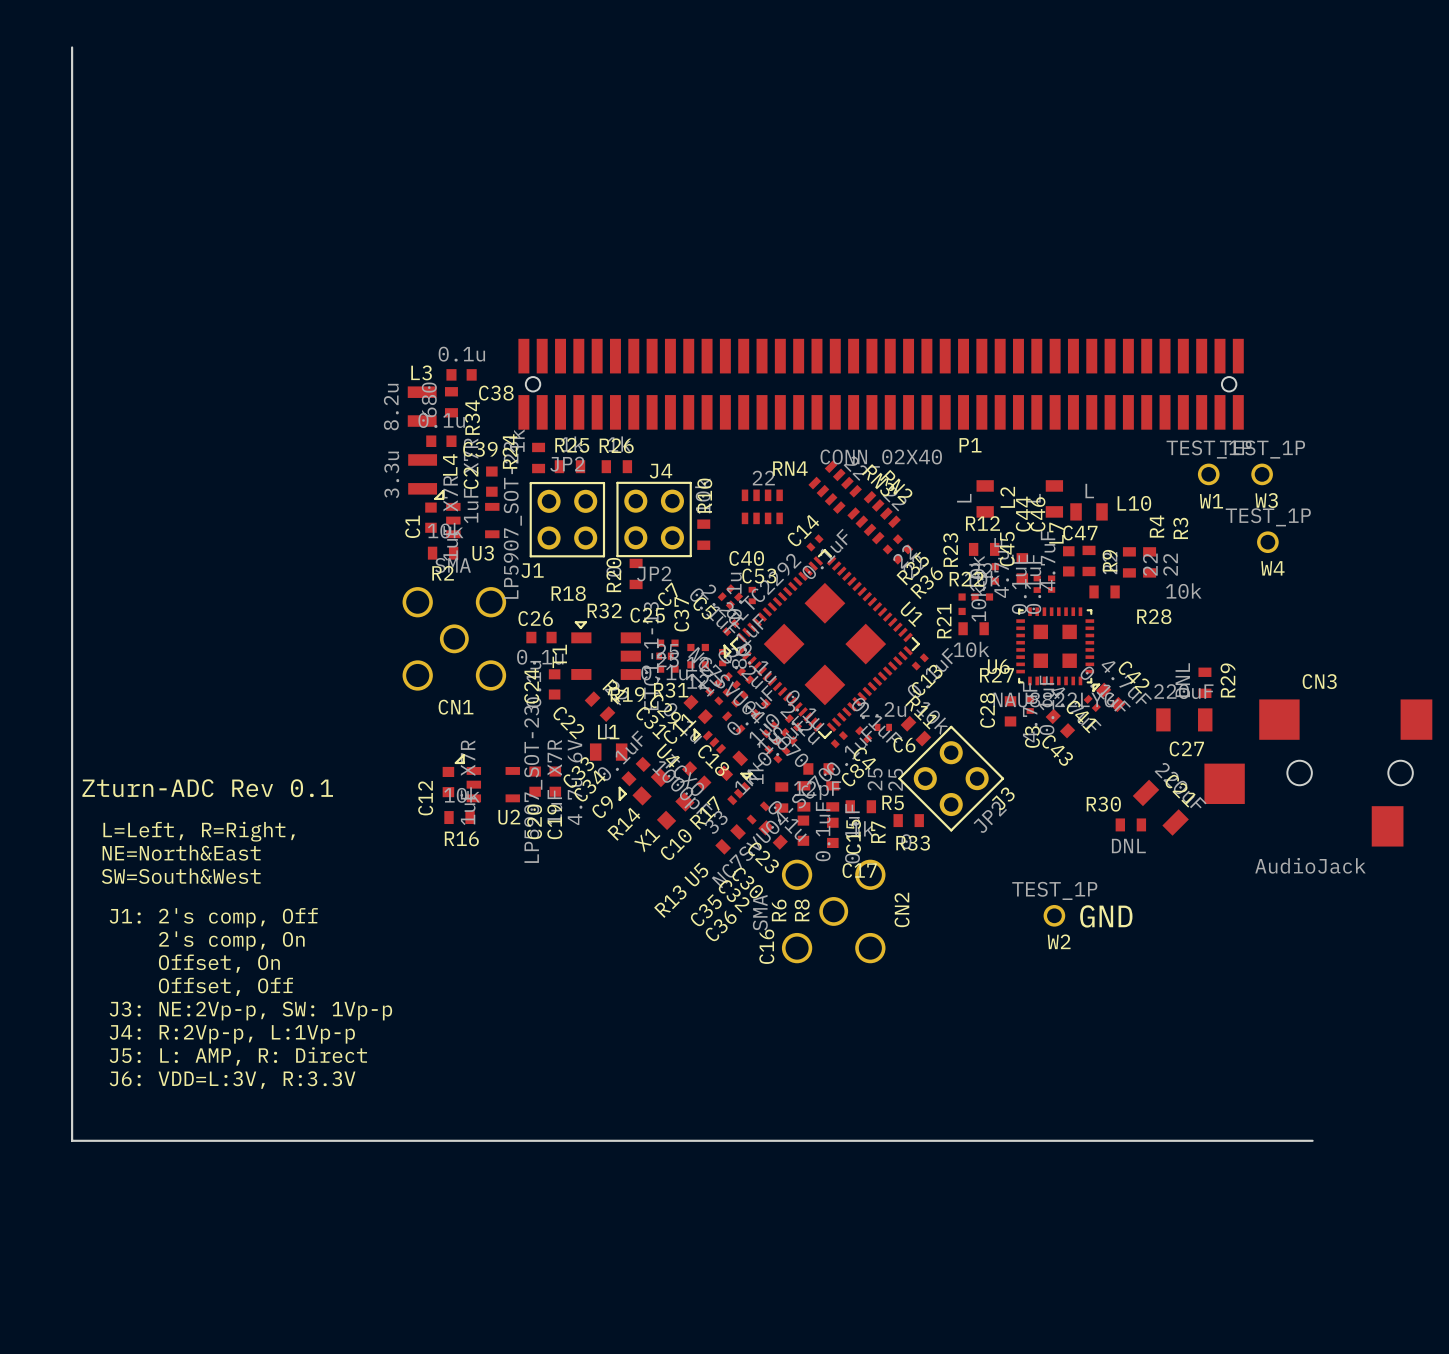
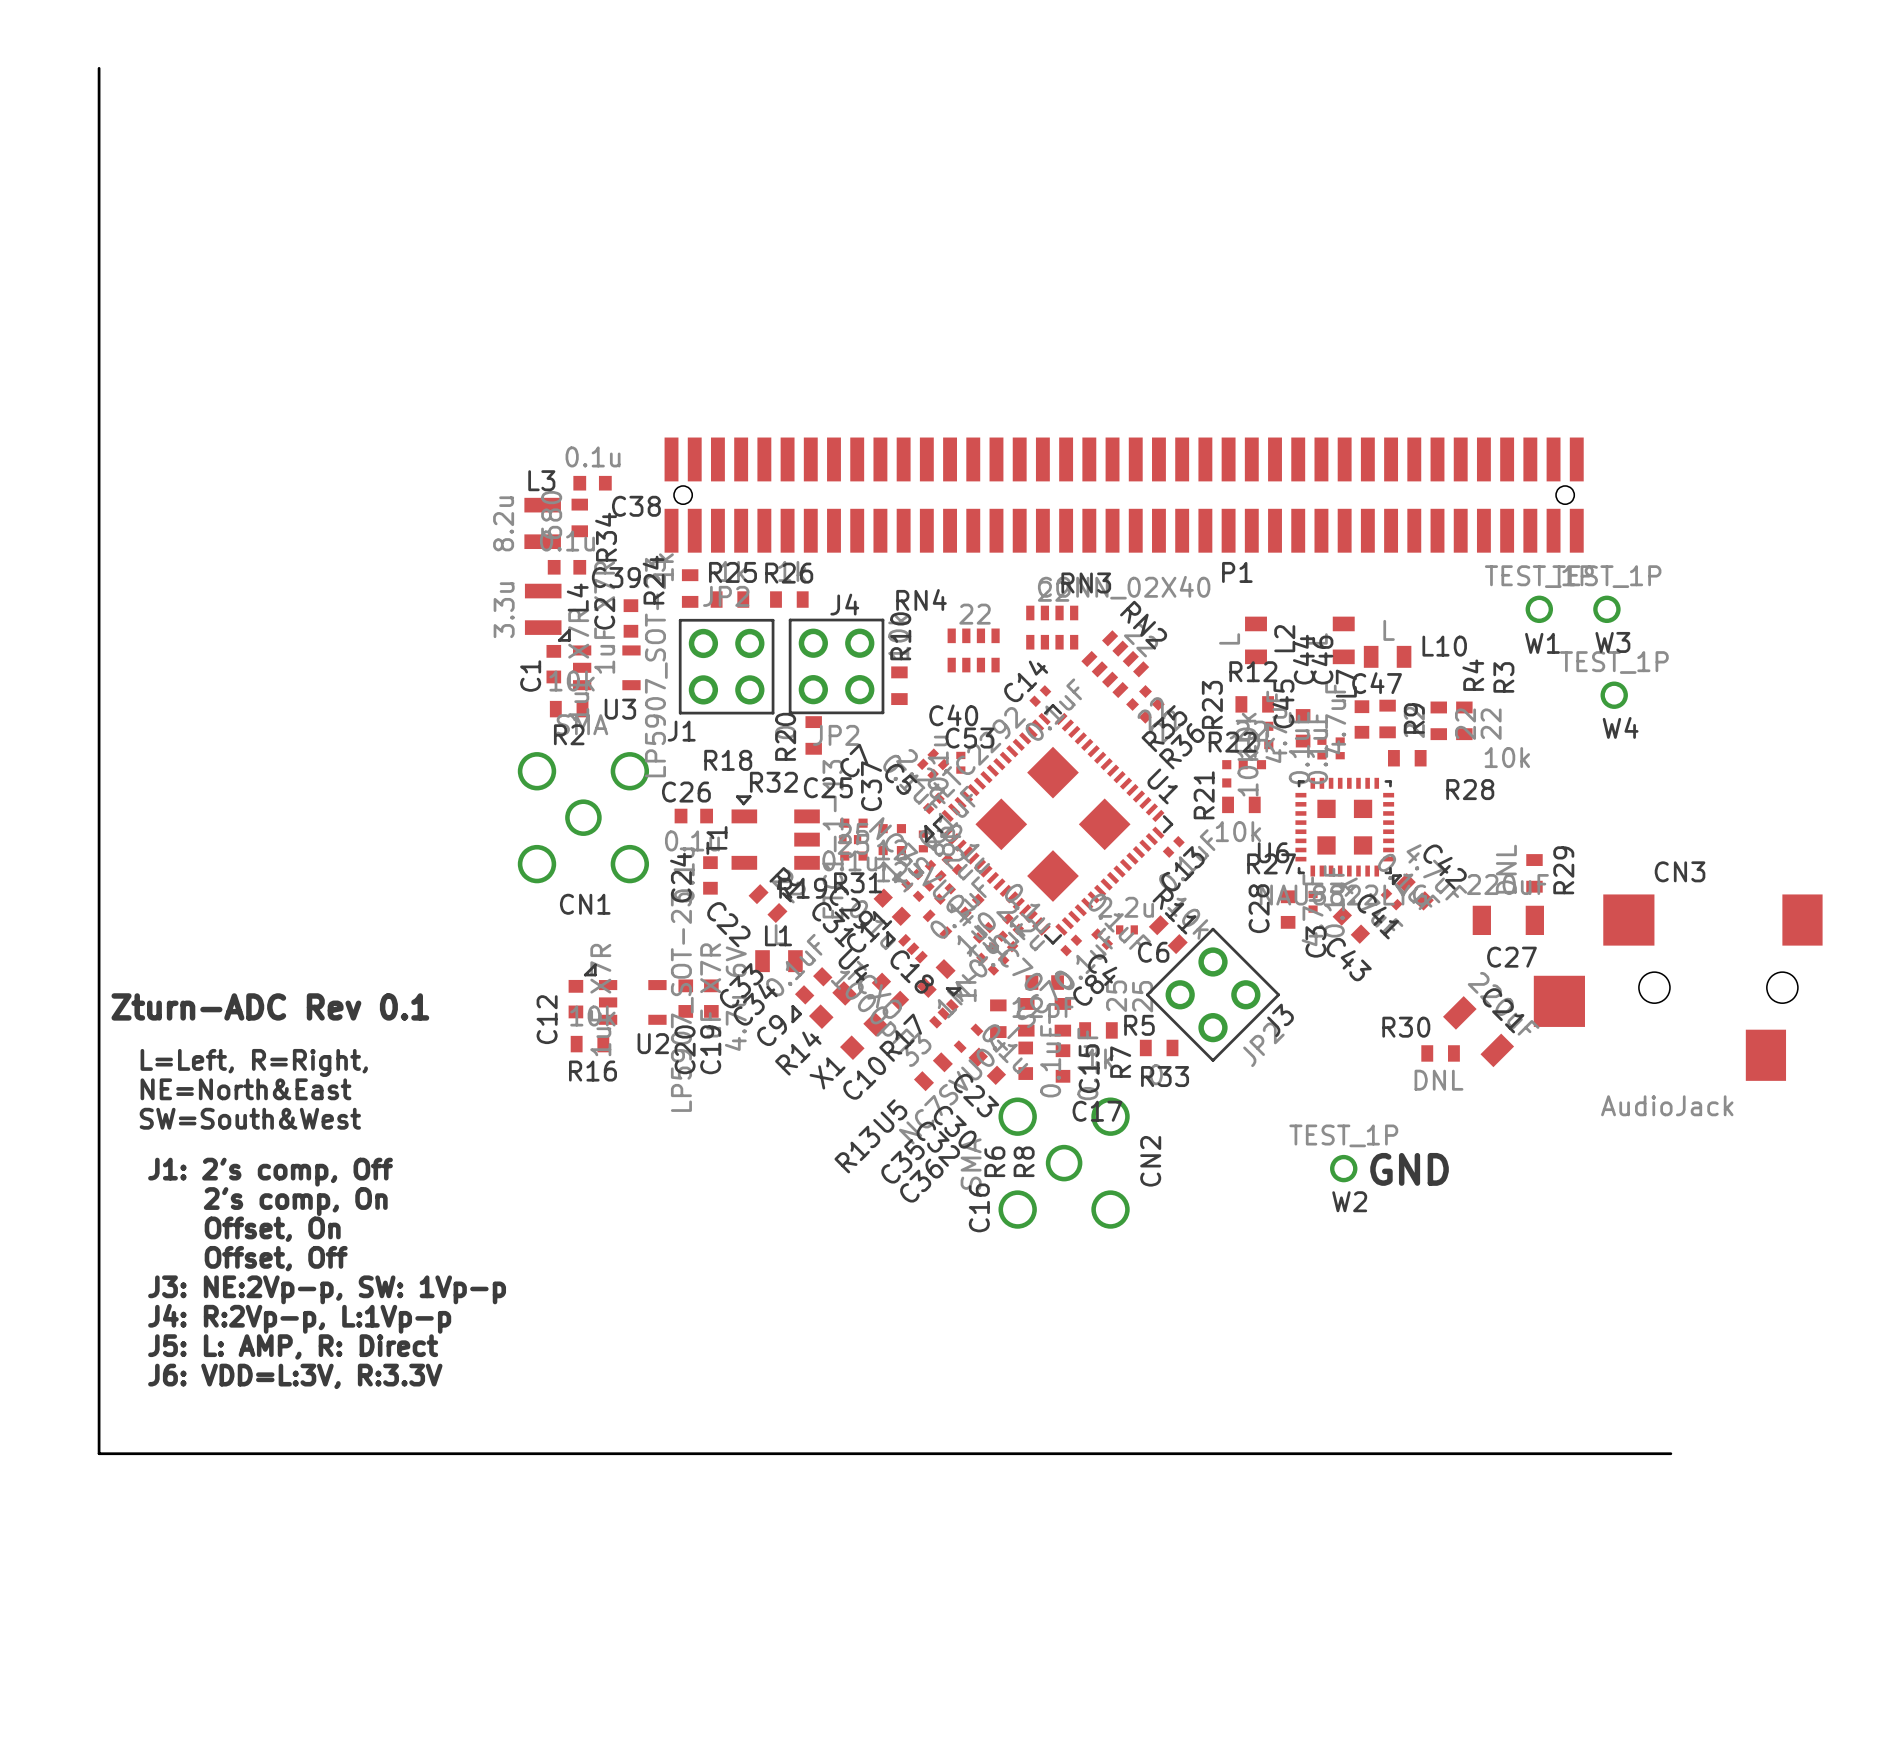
RN4 name position: RN4 (790, 468) -> RN4 (921, 599)
RN3 rotation: 0° (835, 487) -> 45° counterclockwise (1052, 627)

